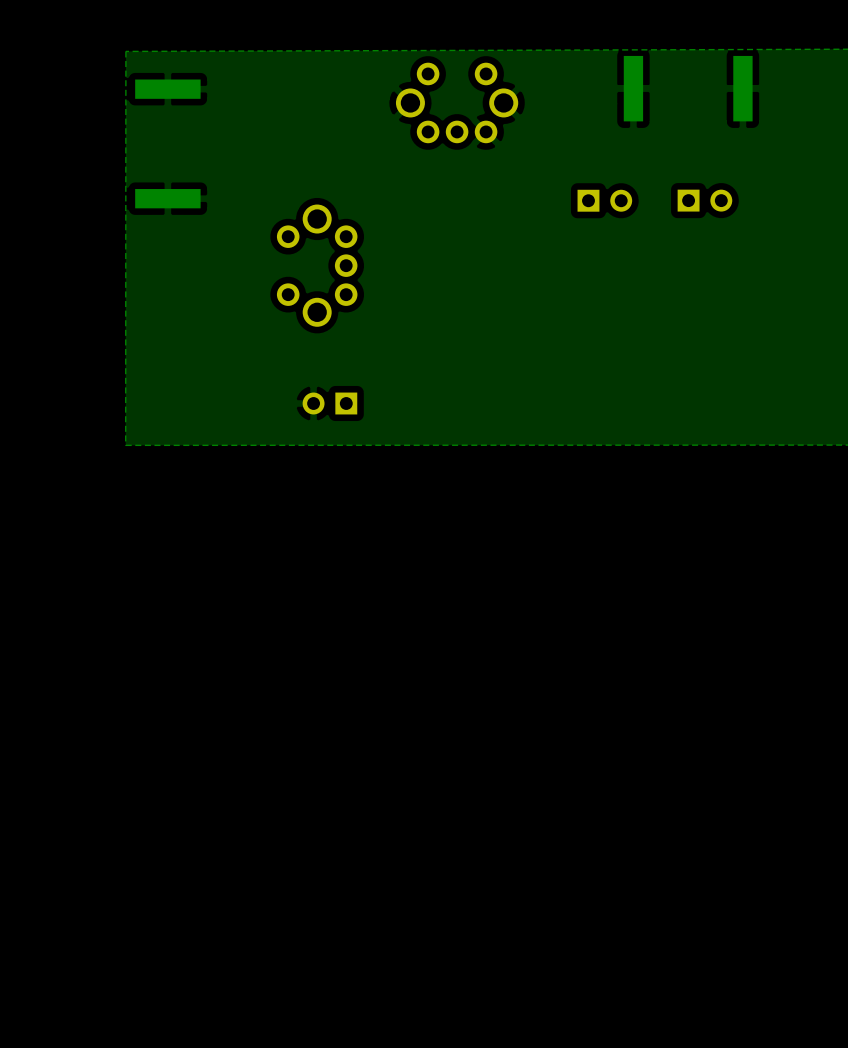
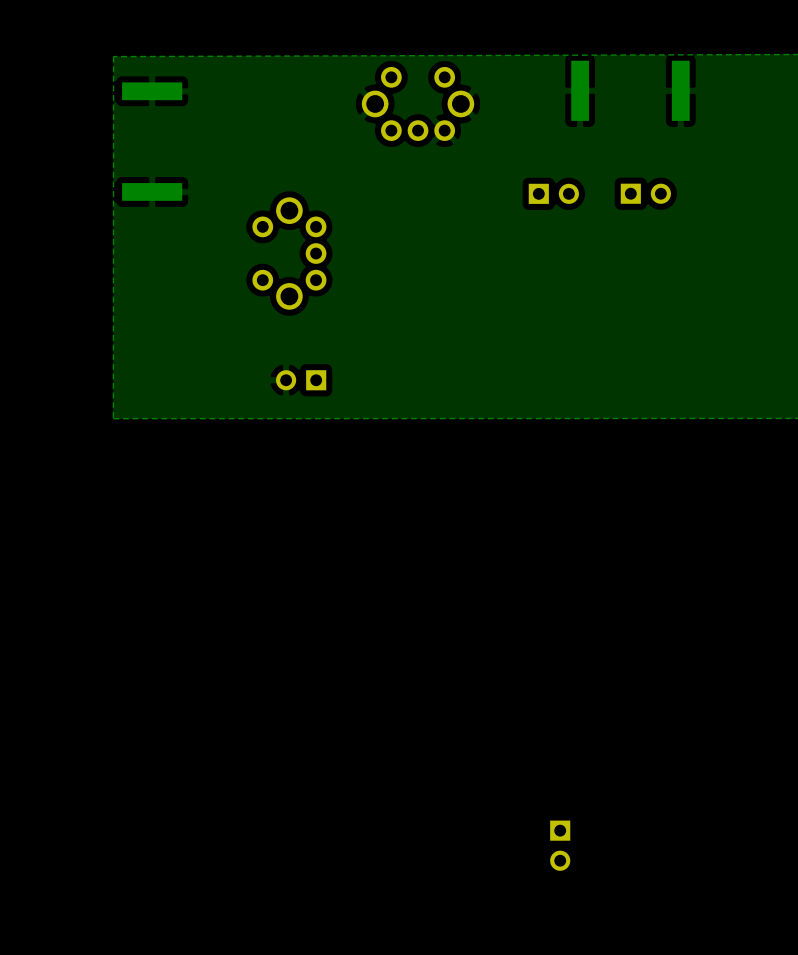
part: none -> (560, 845)

